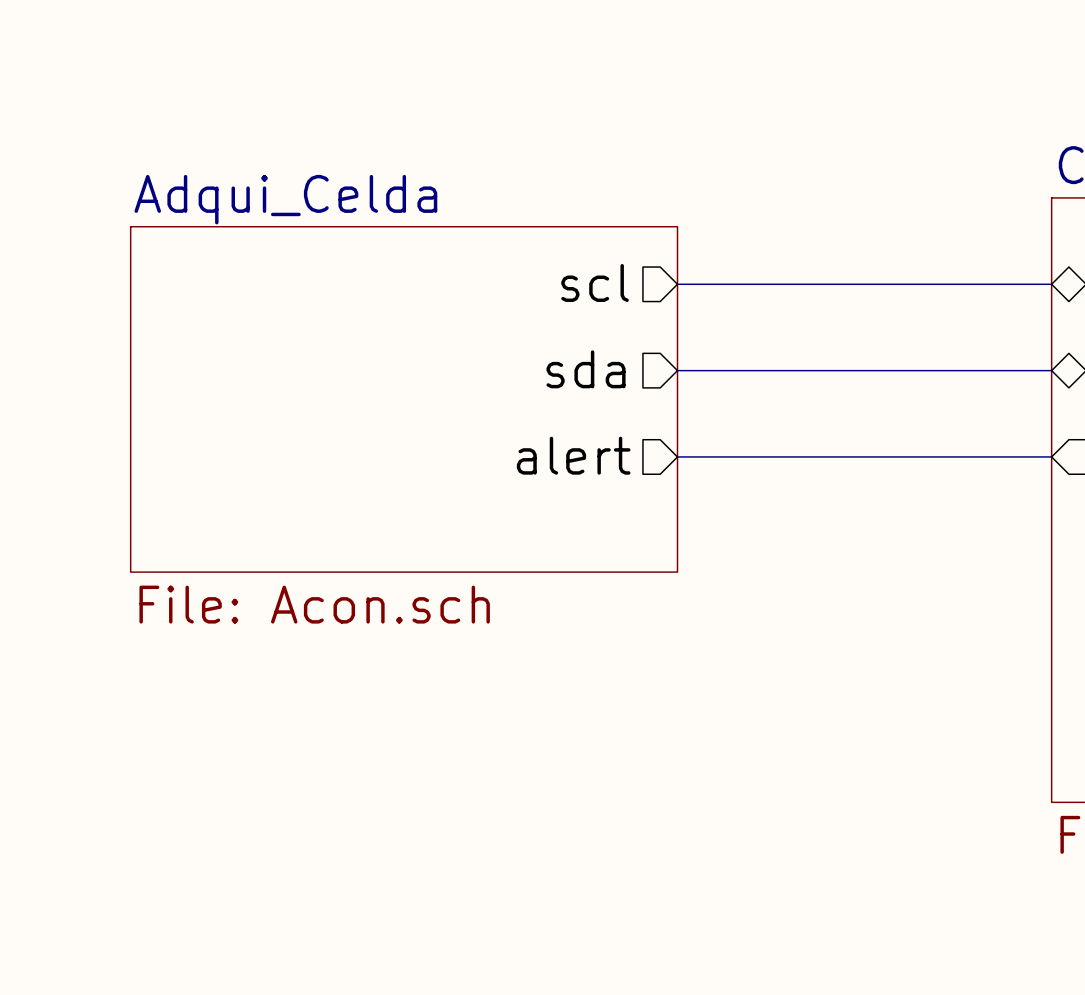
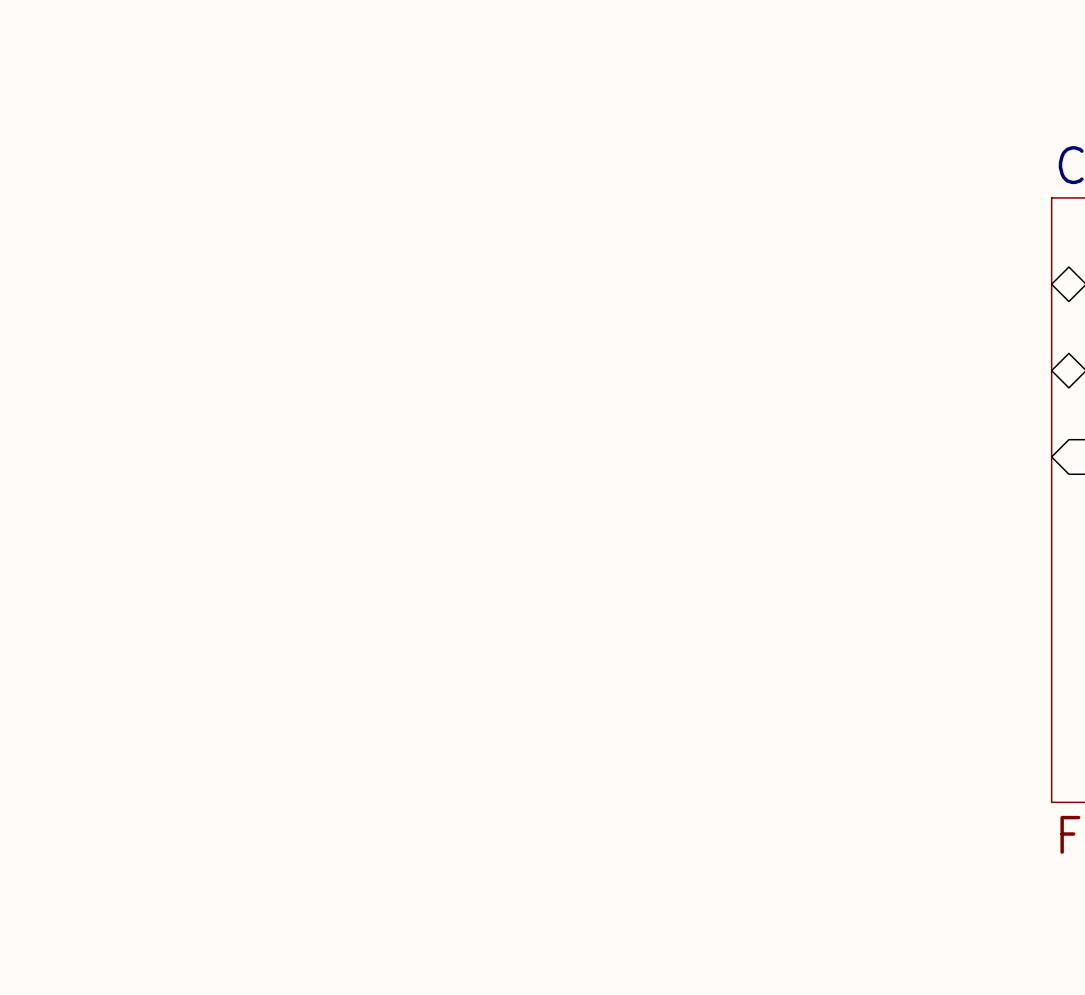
sheet pin: scl (595, 282) -> none
wire: (677, 284) (1051, 284) -> none
sheet pin: sda (586, 369) -> none
wire: (677, 370) (1051, 370) -> none
sheet Adqui_Celda: File: Acon.sch (404, 399) -> none
sheet pin: alert (573, 455) -> none
wire: (677, 456) (1051, 456) -> none

